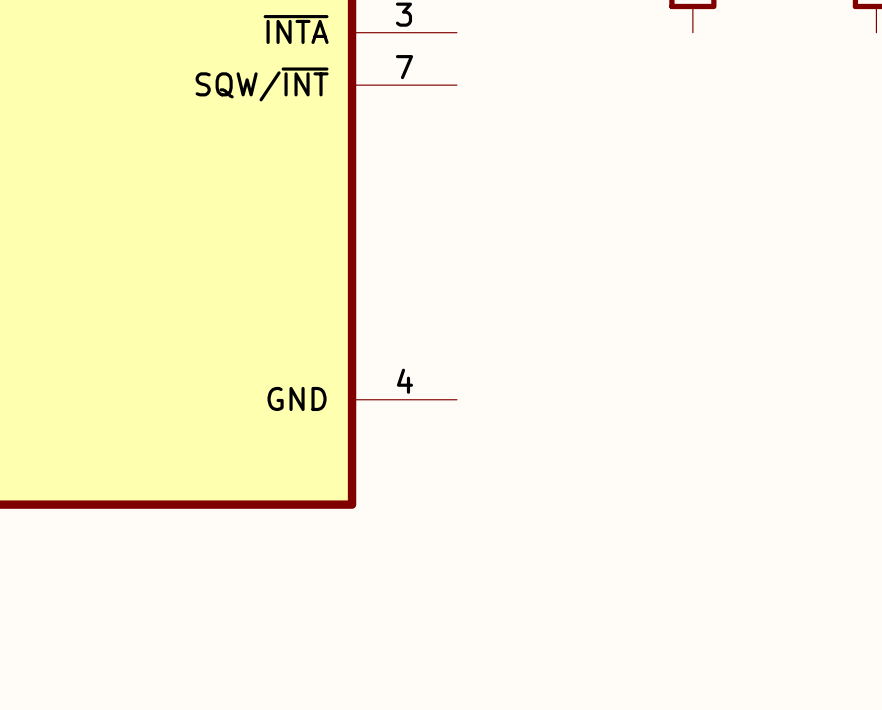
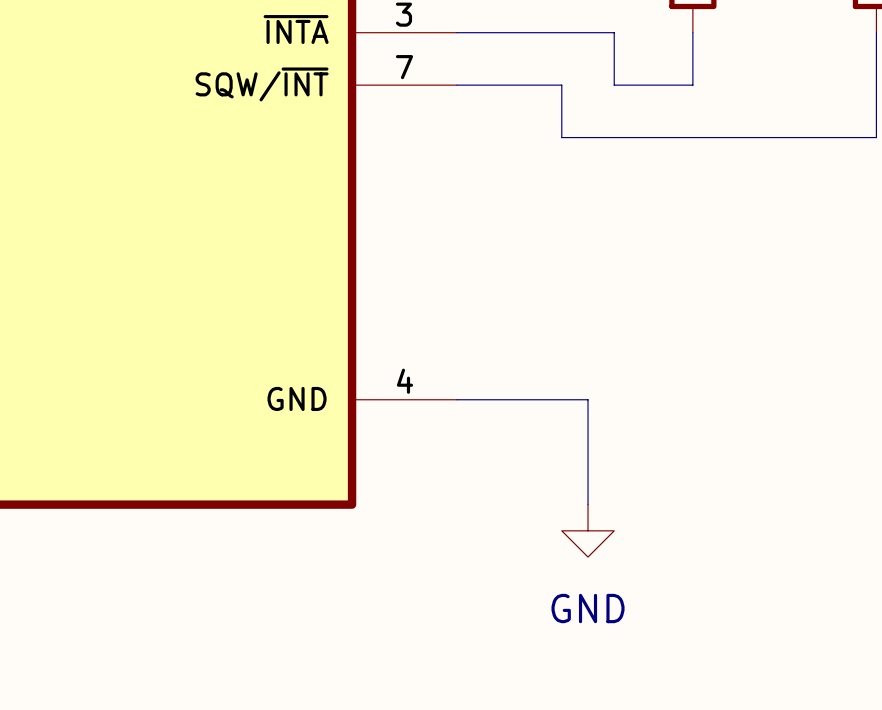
wire: none -> (456, 32) (614, 32) (614, 85) (692, 85) (692, 32)
wire: none -> (876, 32) (876, 137) (561, 137) (561, 85) (456, 85)
wire: none -> (456, 399) (588, 399) (588, 504)
power symbol: none -> GND (588, 530)

